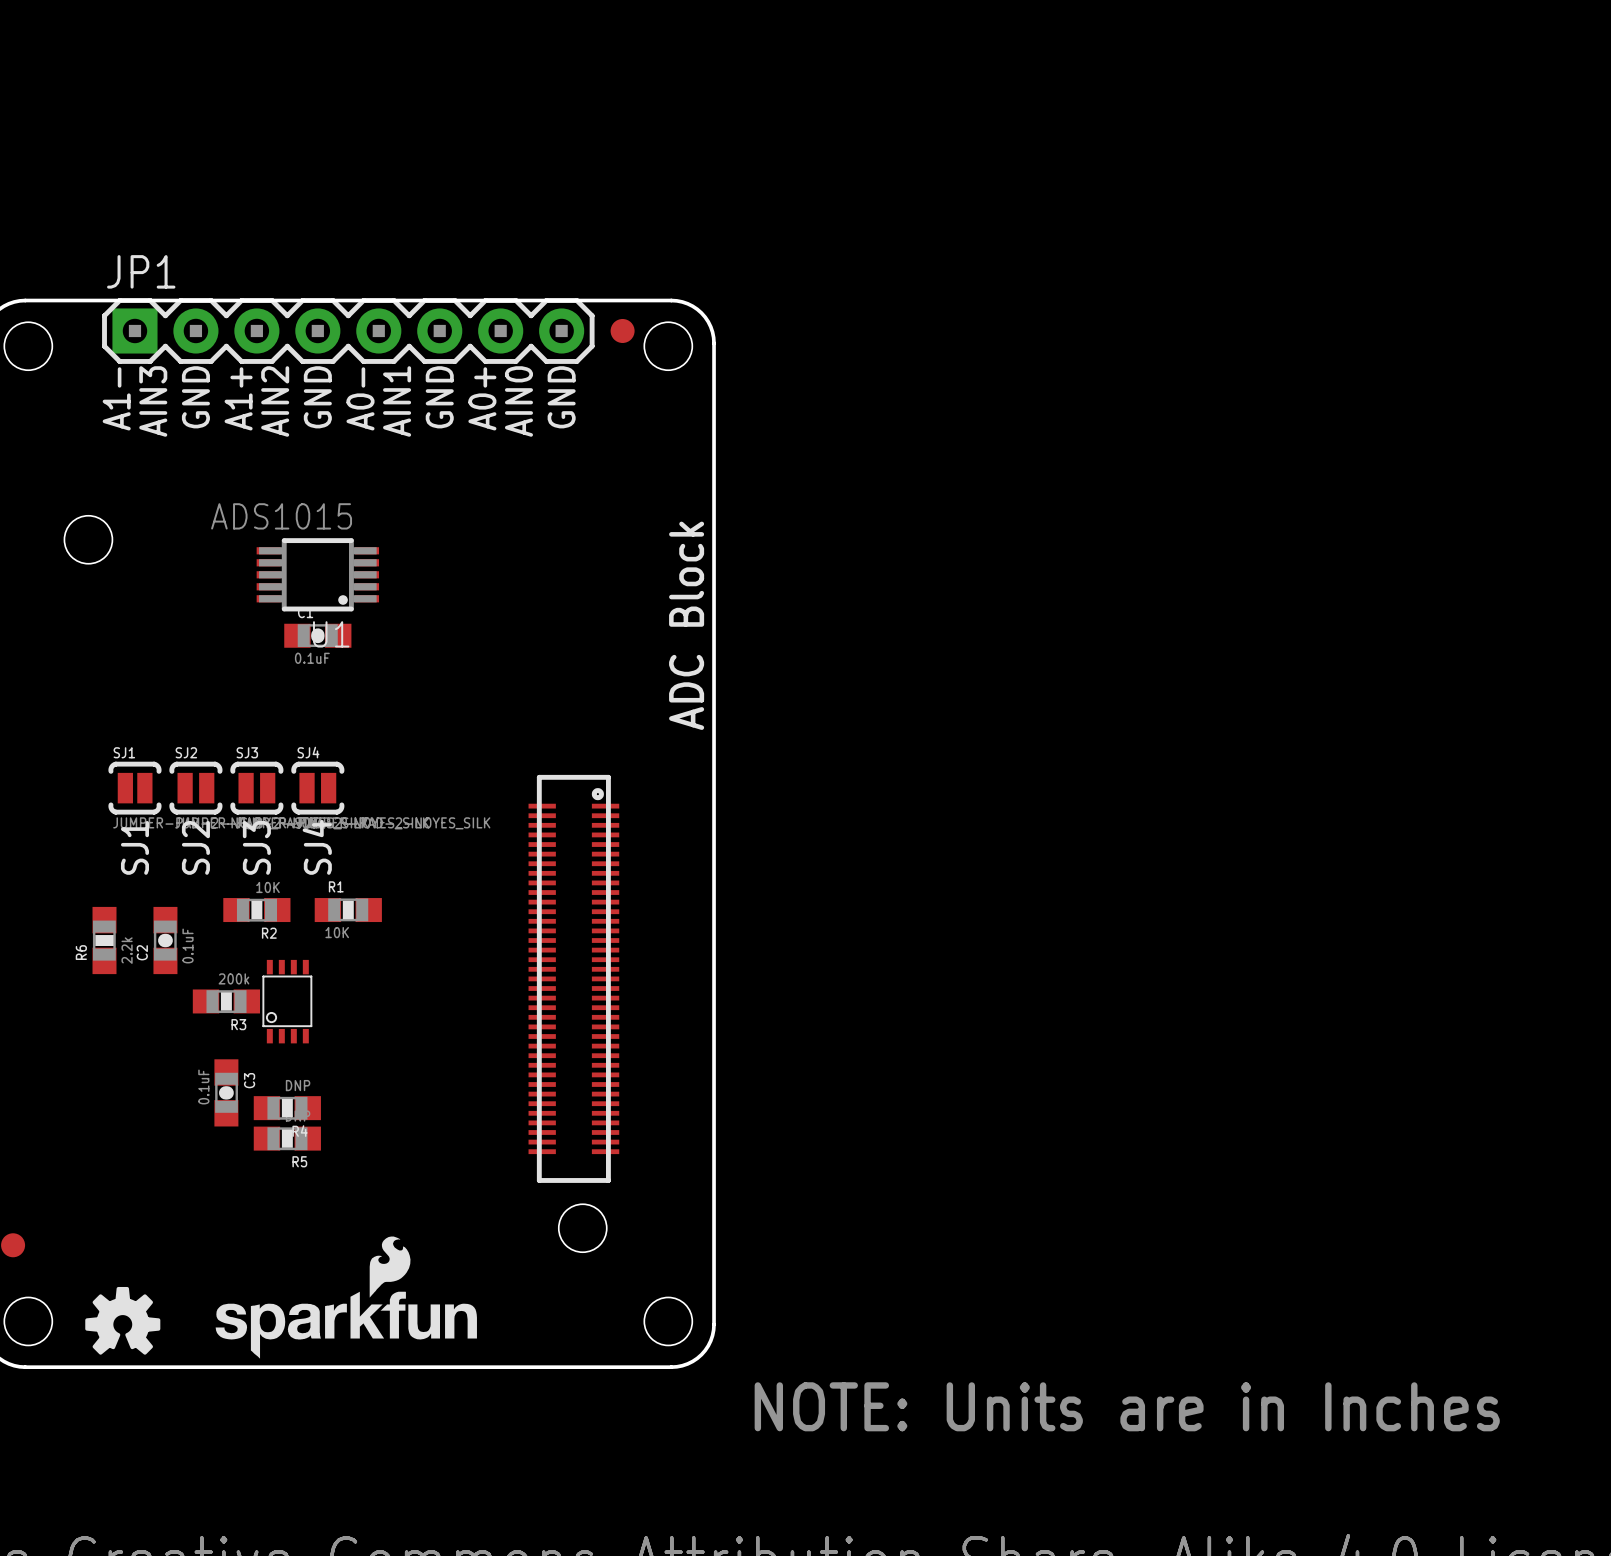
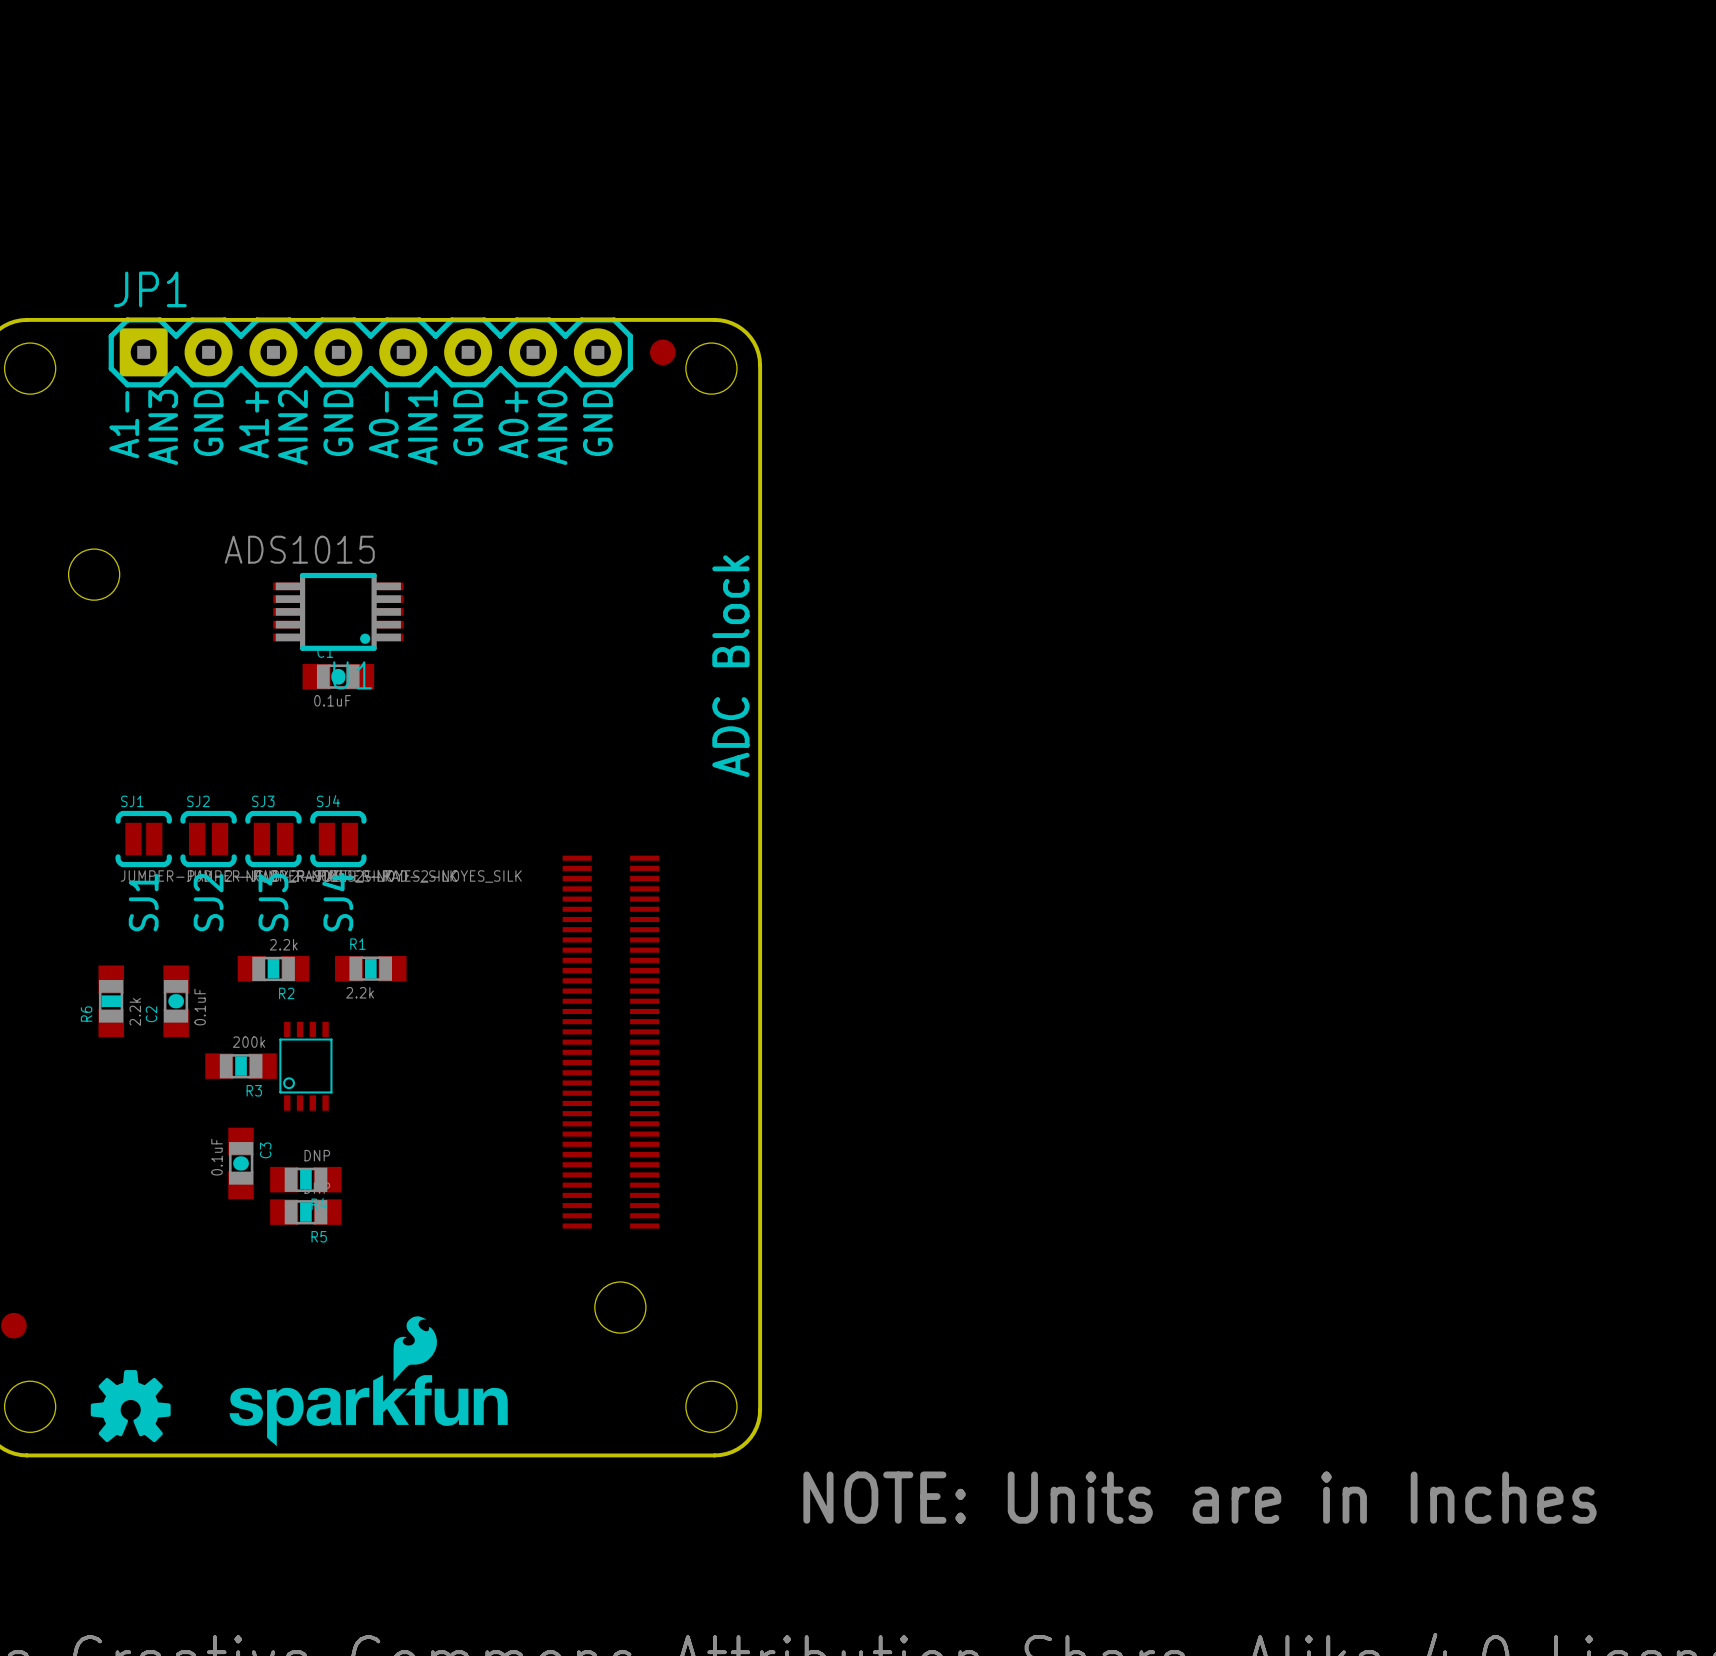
part footprint: [528, 774, 620, 1183] -> [562, 855, 660, 1229]
R2 value: 10K (268, 887) -> 2.2k (283, 944)
R1 value: 10K (337, 932) -> 2.2k (360, 992)

